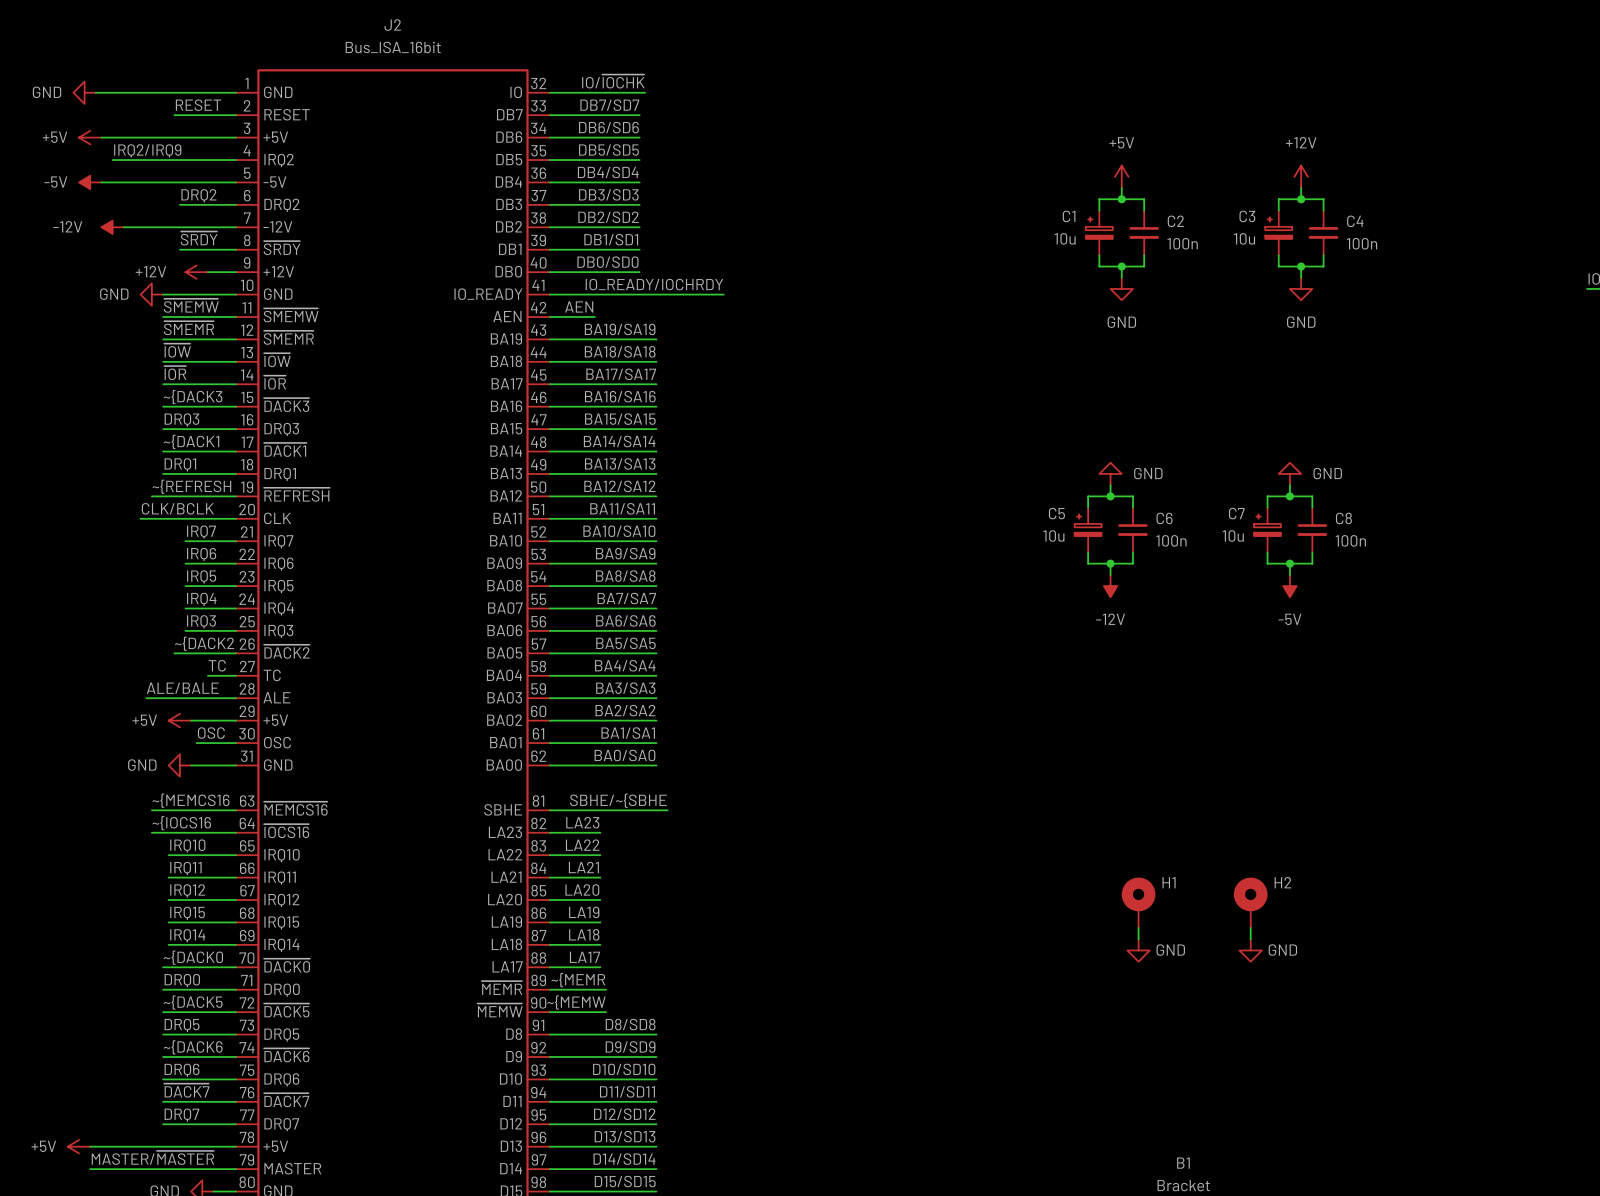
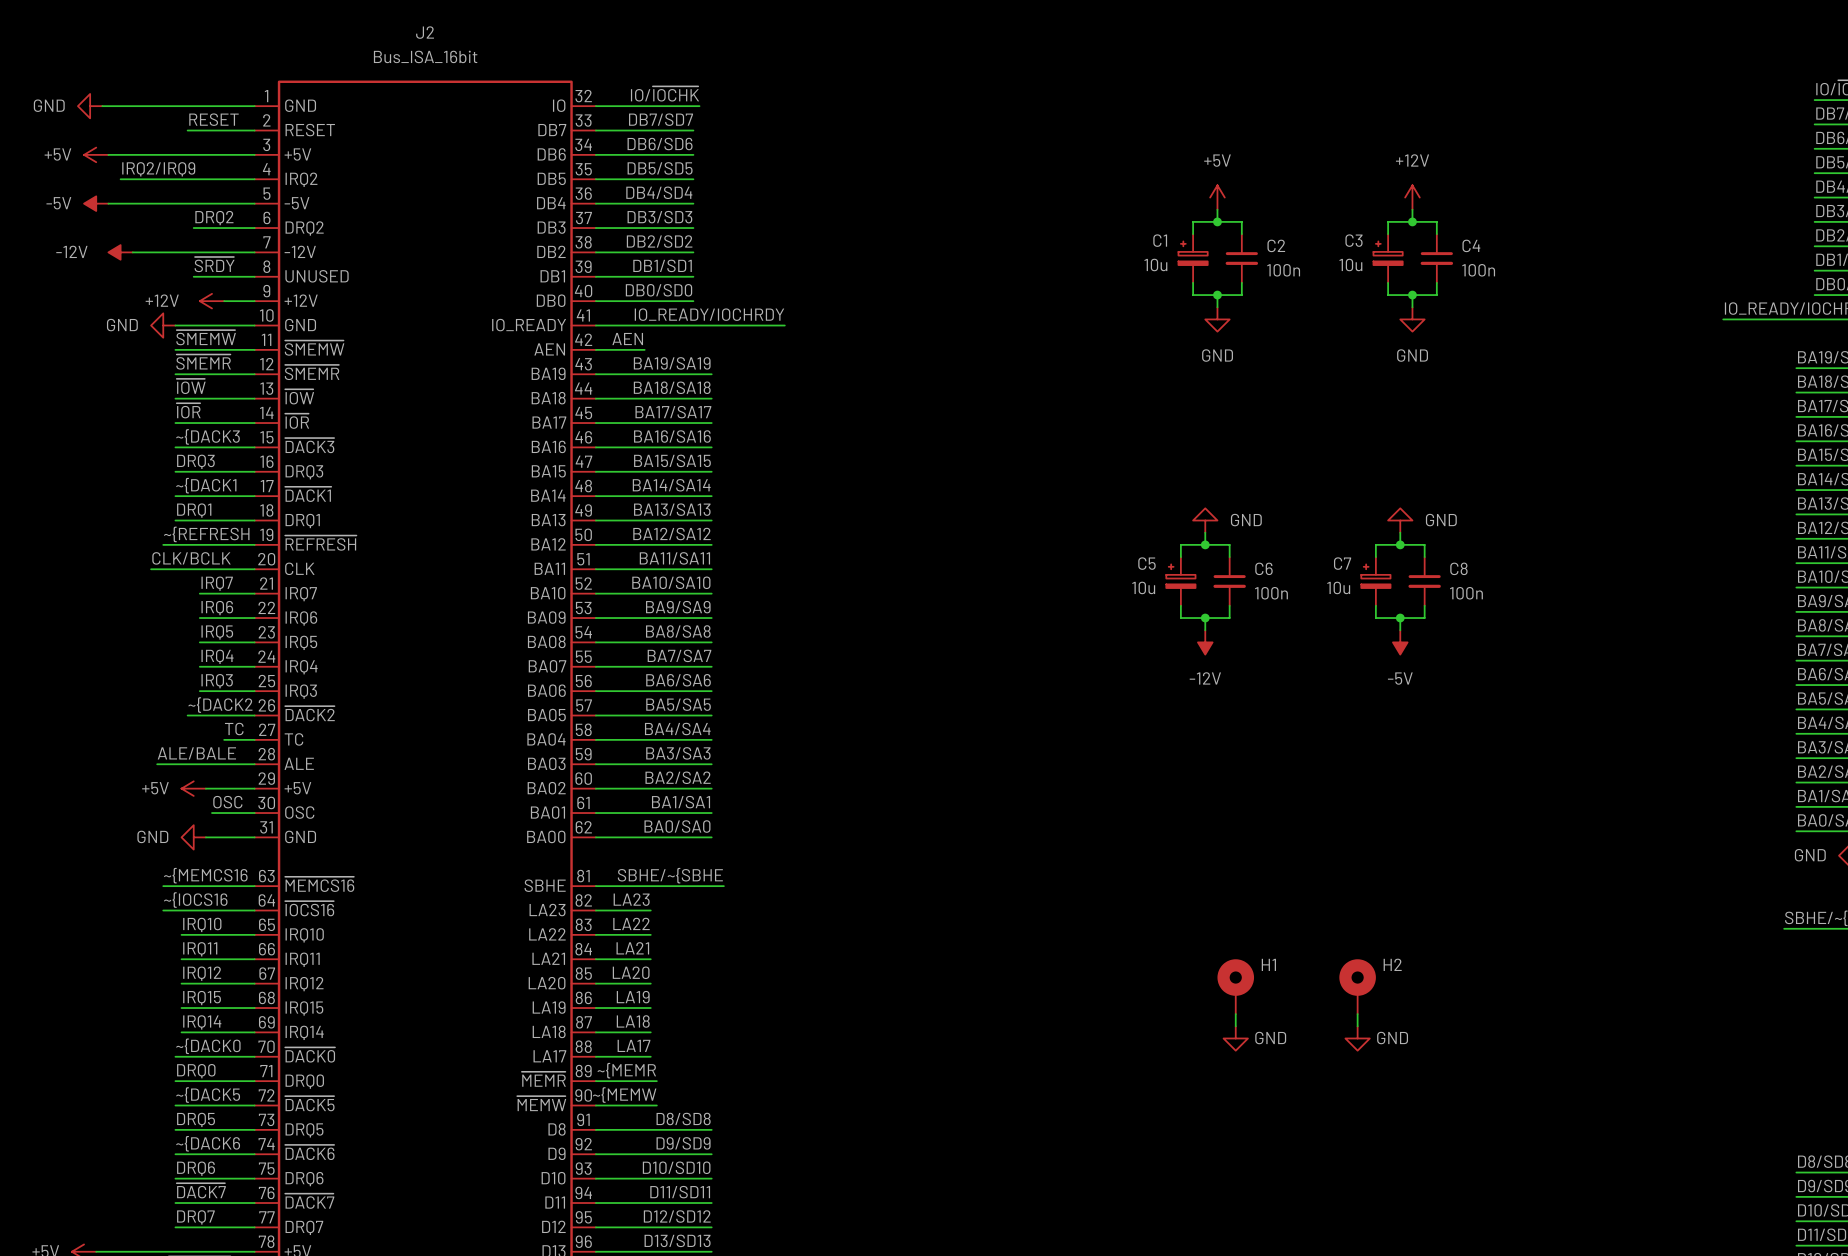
J2 pin name: ~{SRDY} (282, 248) -> UNUSED (317, 276)

